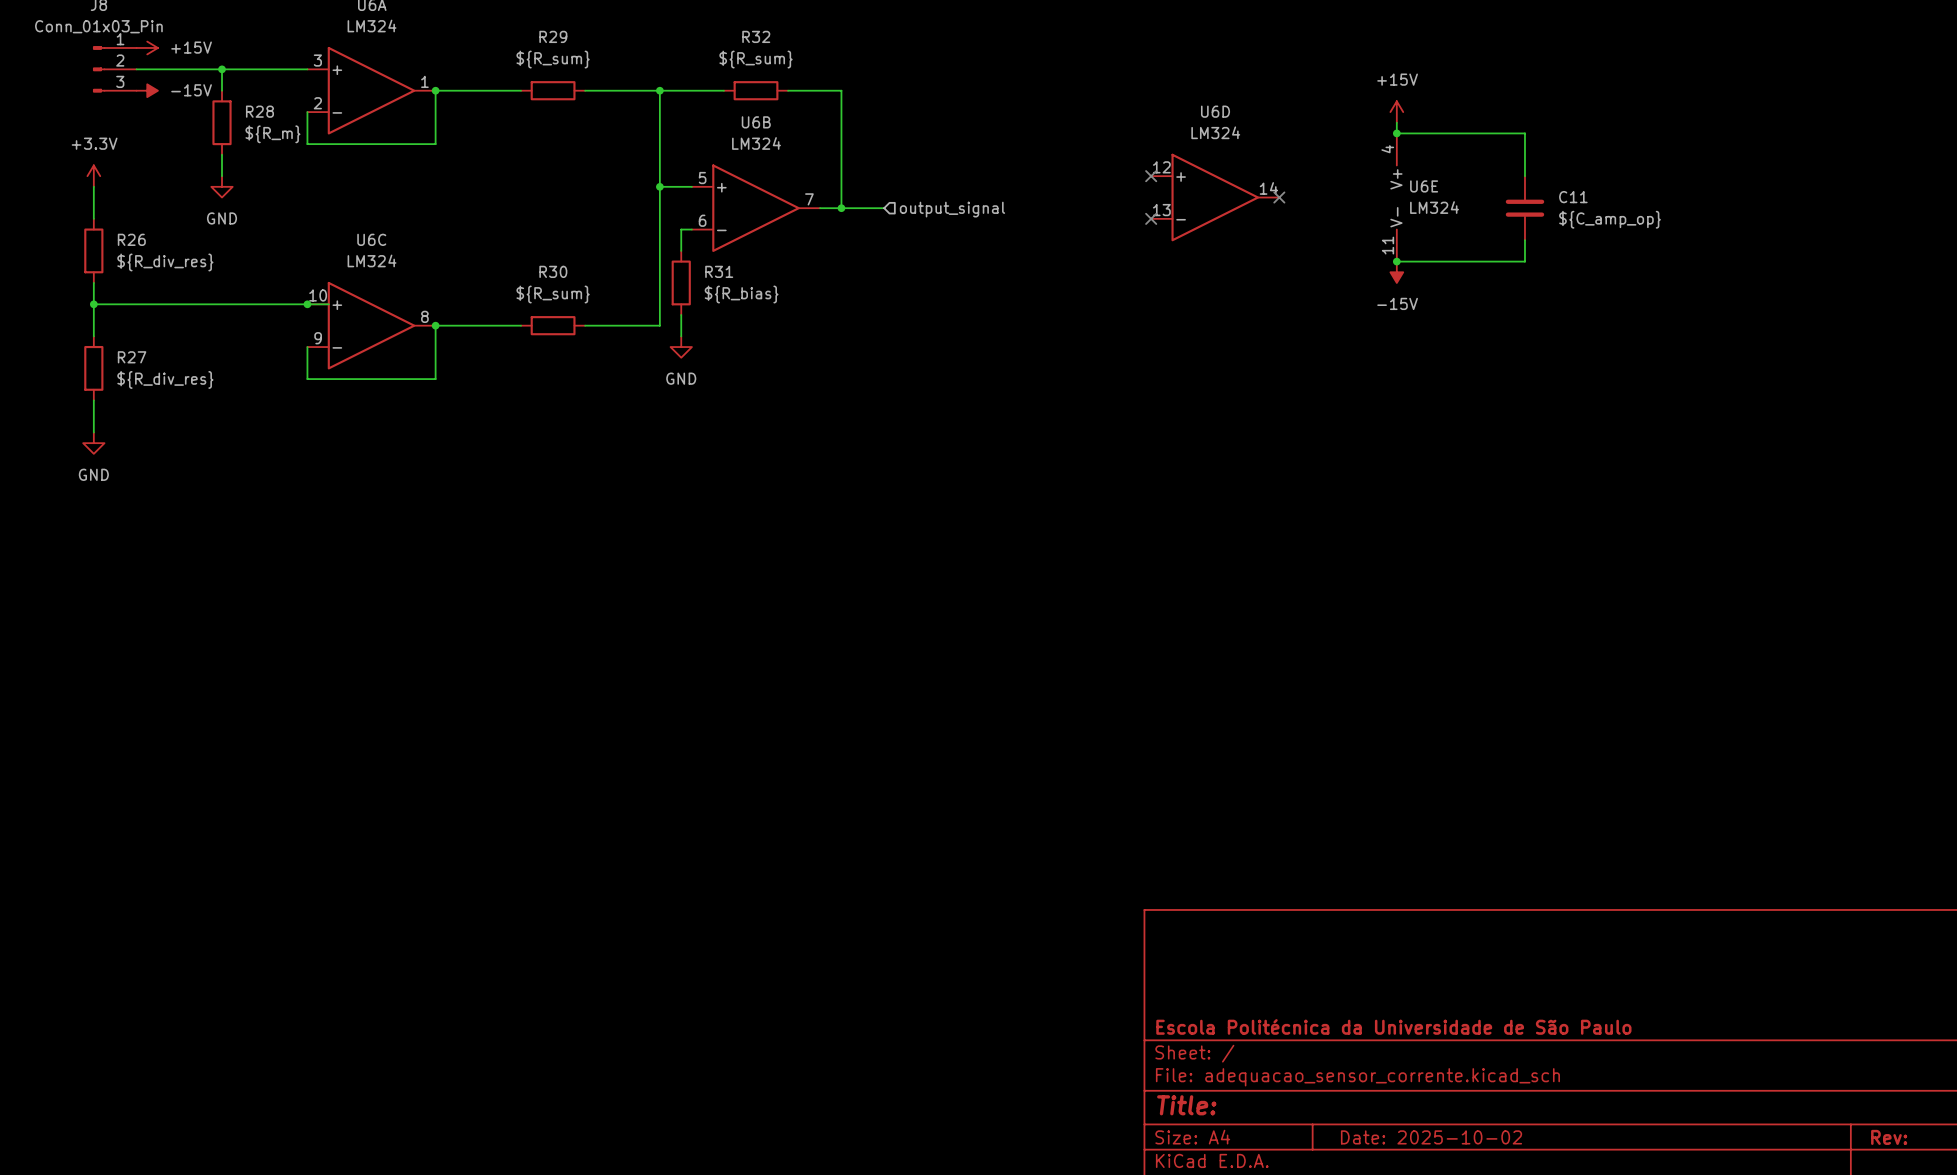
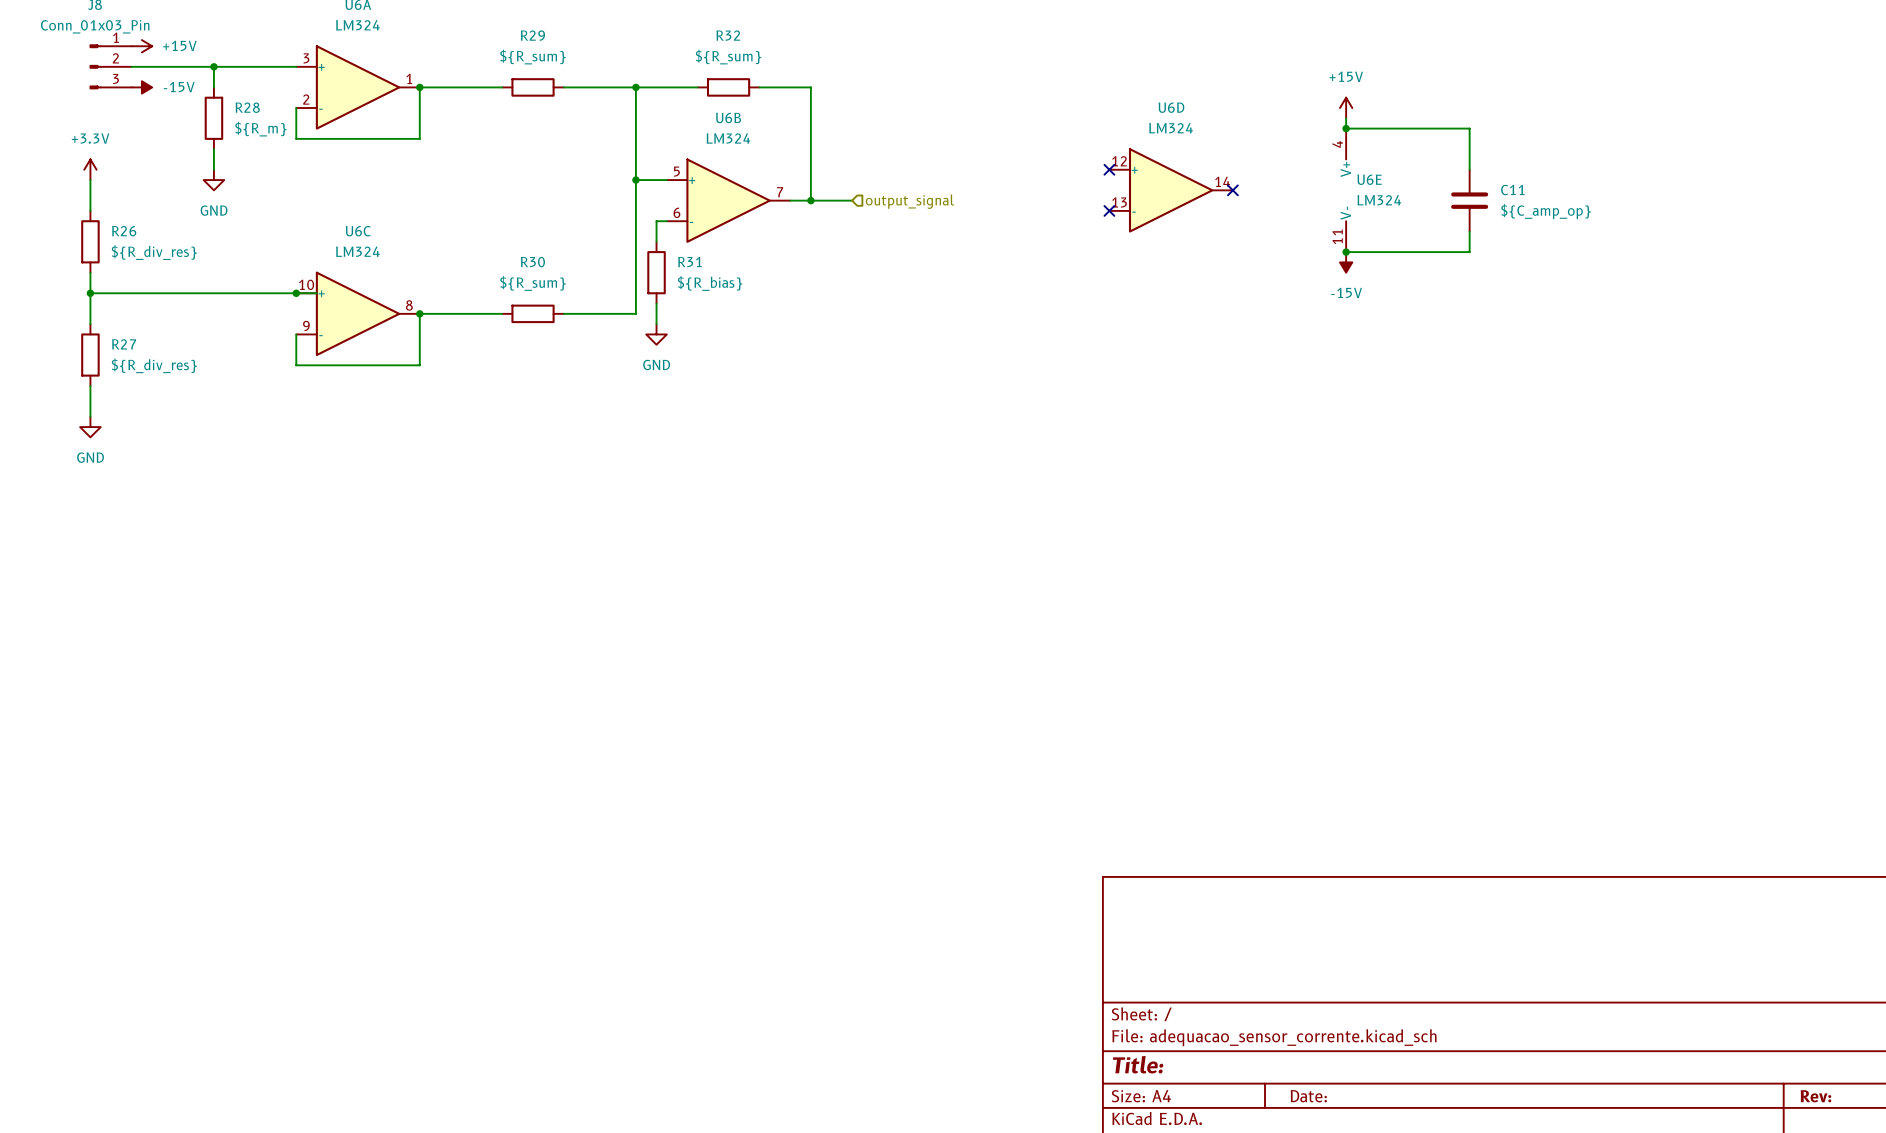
title block: Escola Politécnica da Universidade de São Paulo (1393, 1026) -> none
title block: Date: 2025-10-02 (1431, 1137) -> Date: (1308, 1096)

